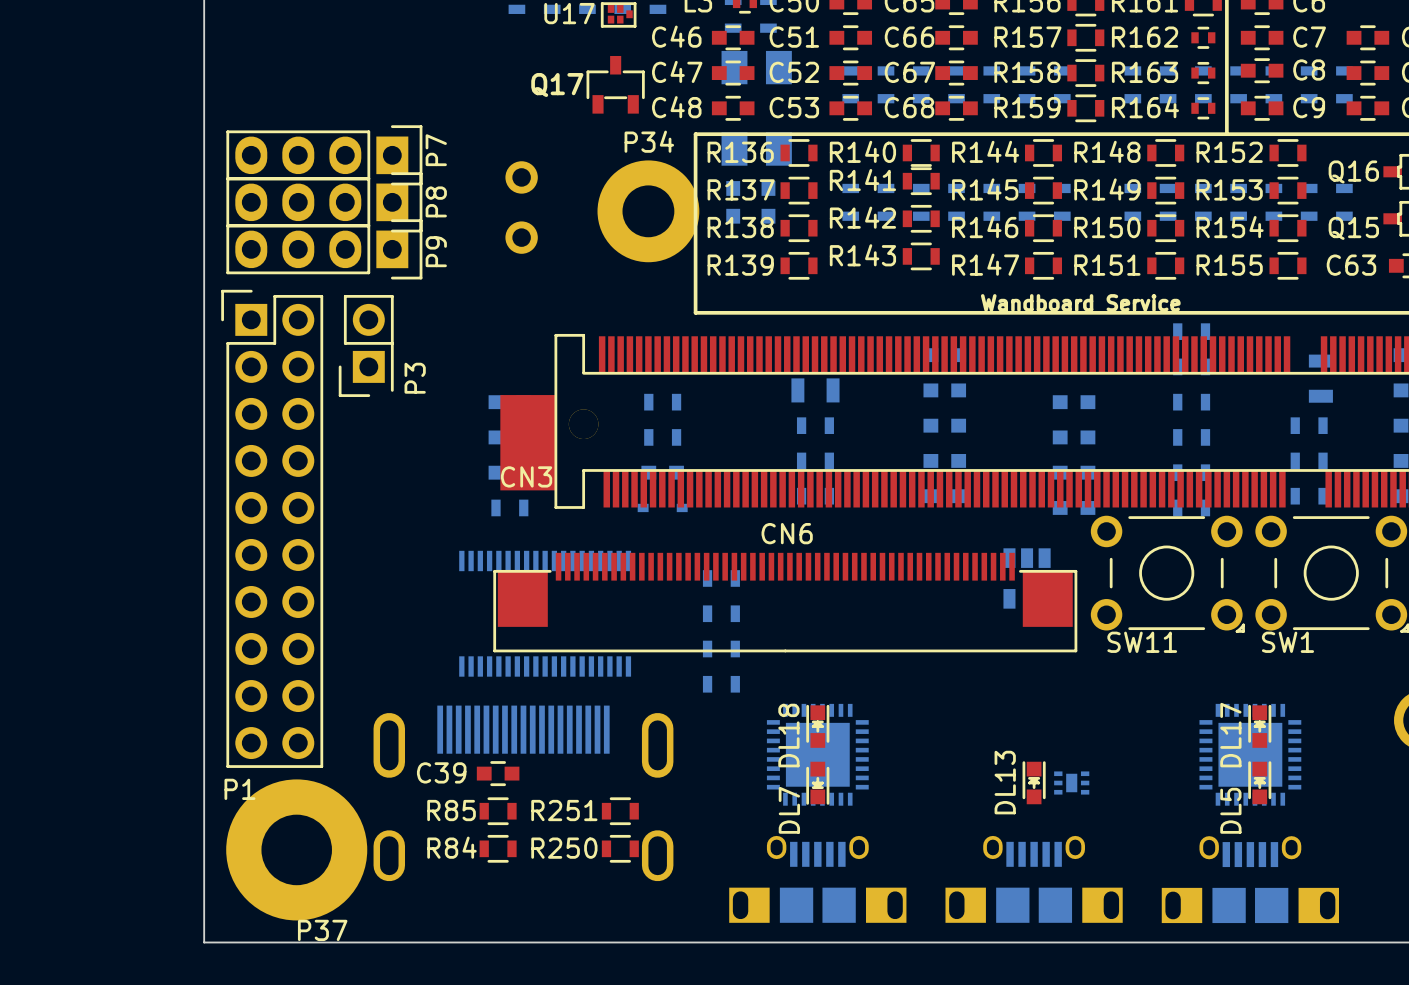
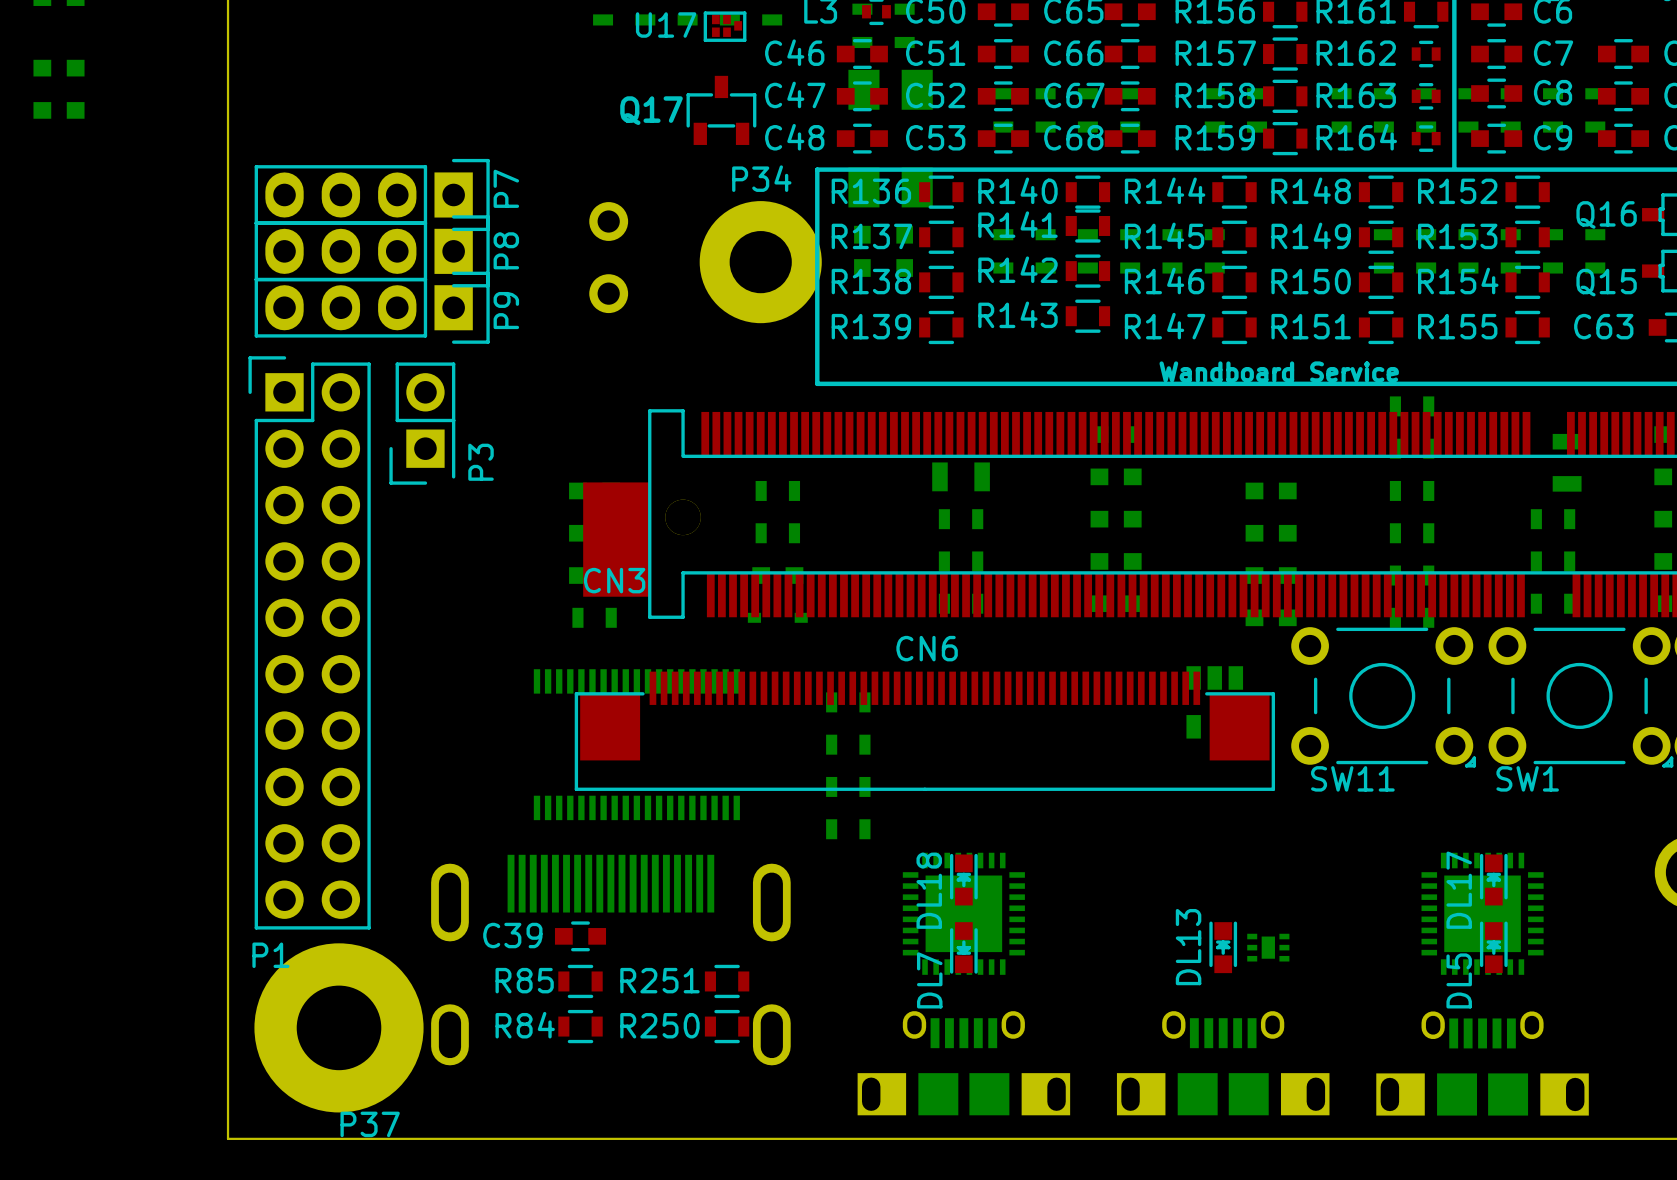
part: none -> (59, 68)
part: none -> (59, 110)
part: (991, 84) -> none
part: (1062, 202) -> none
part: (1132, 202) -> none

